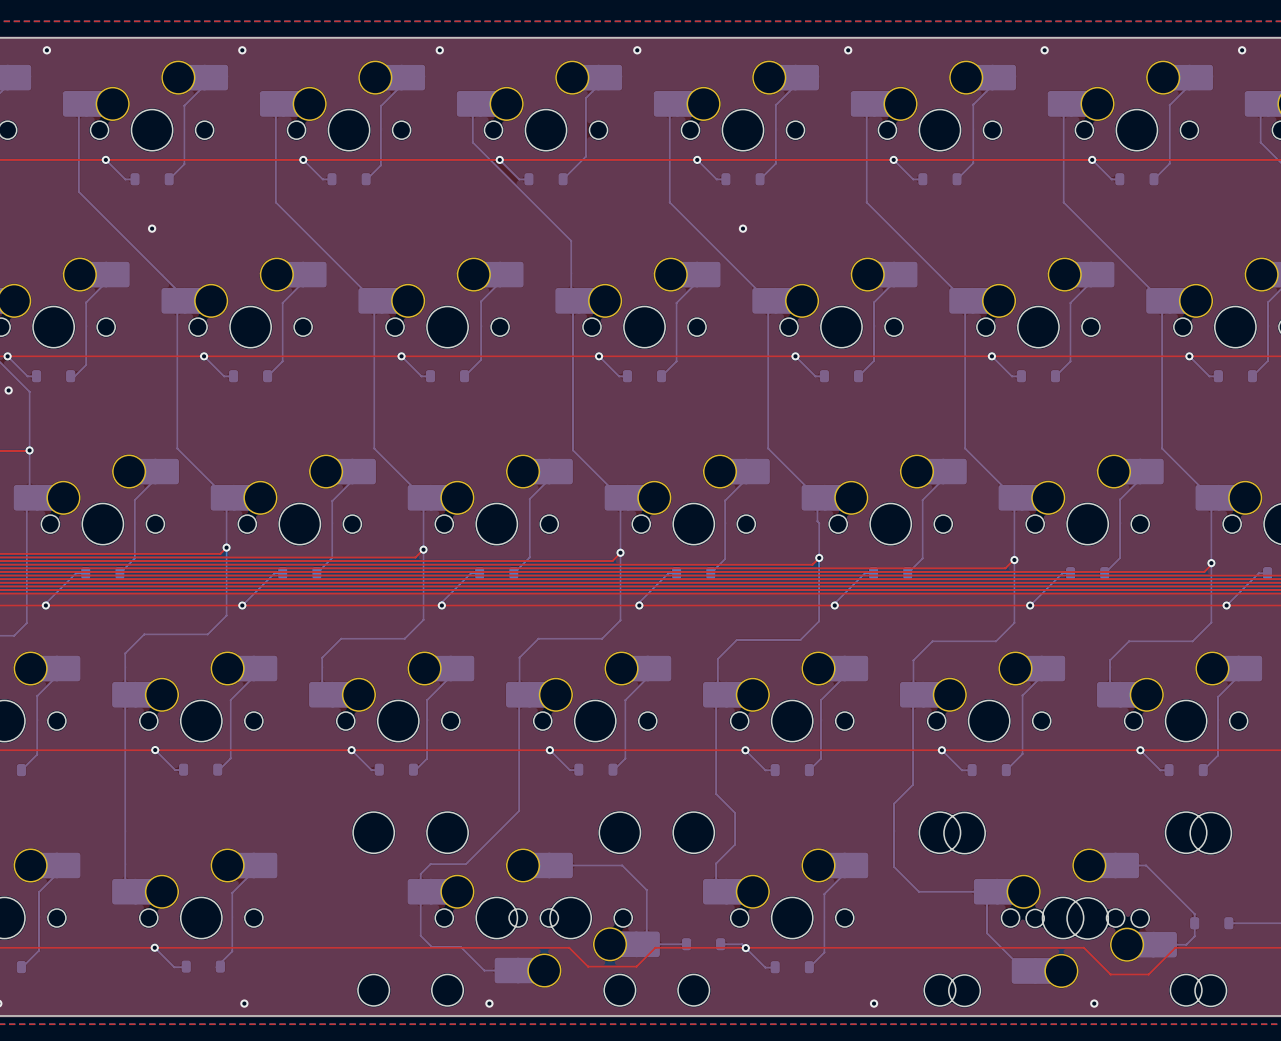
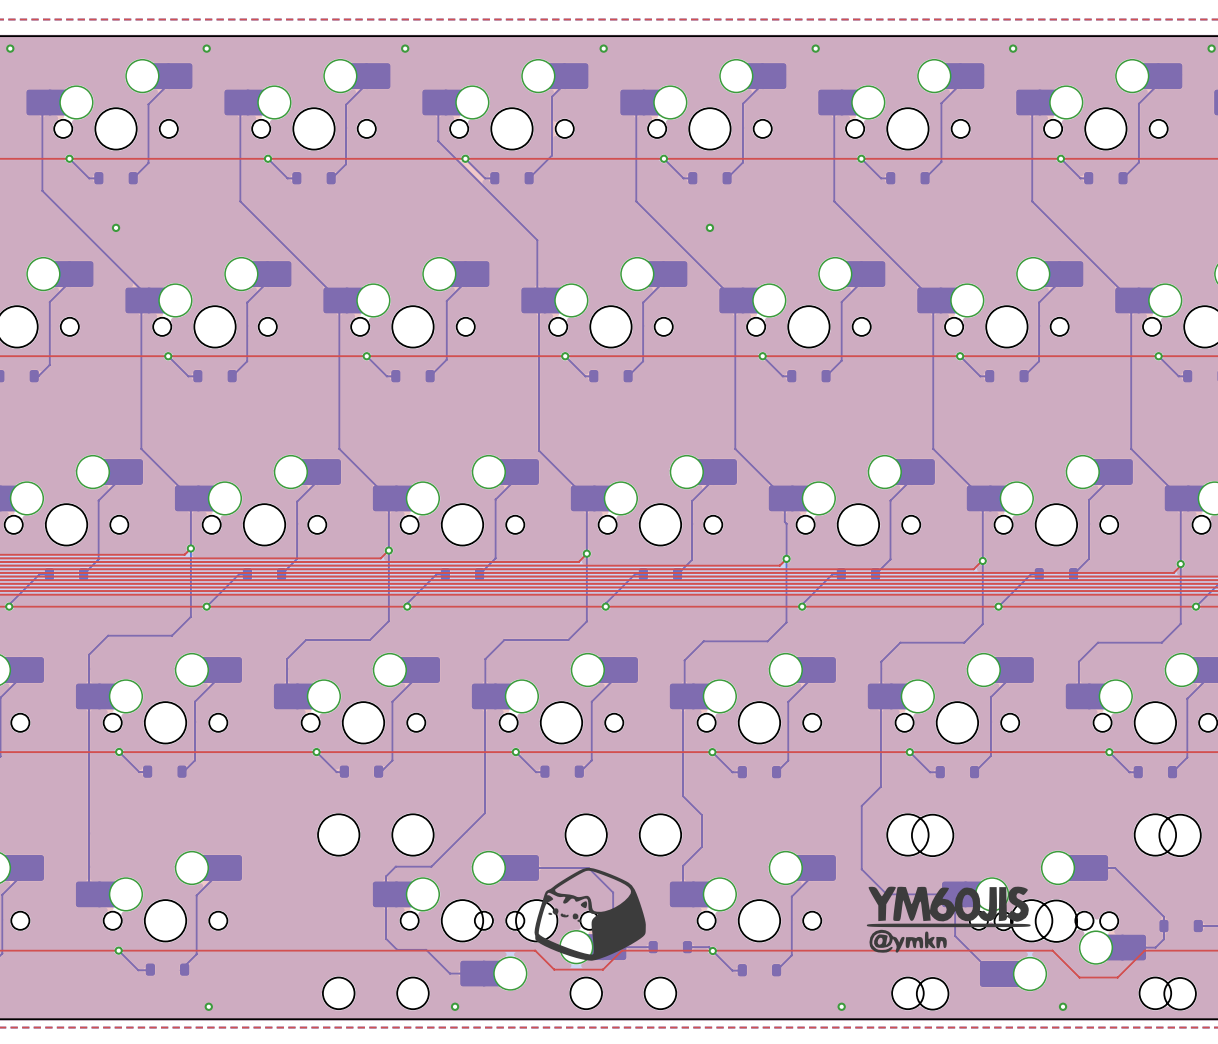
drawing: none -> [534, 867, 646, 961]
drawing: none -> [866, 886, 1031, 953]

